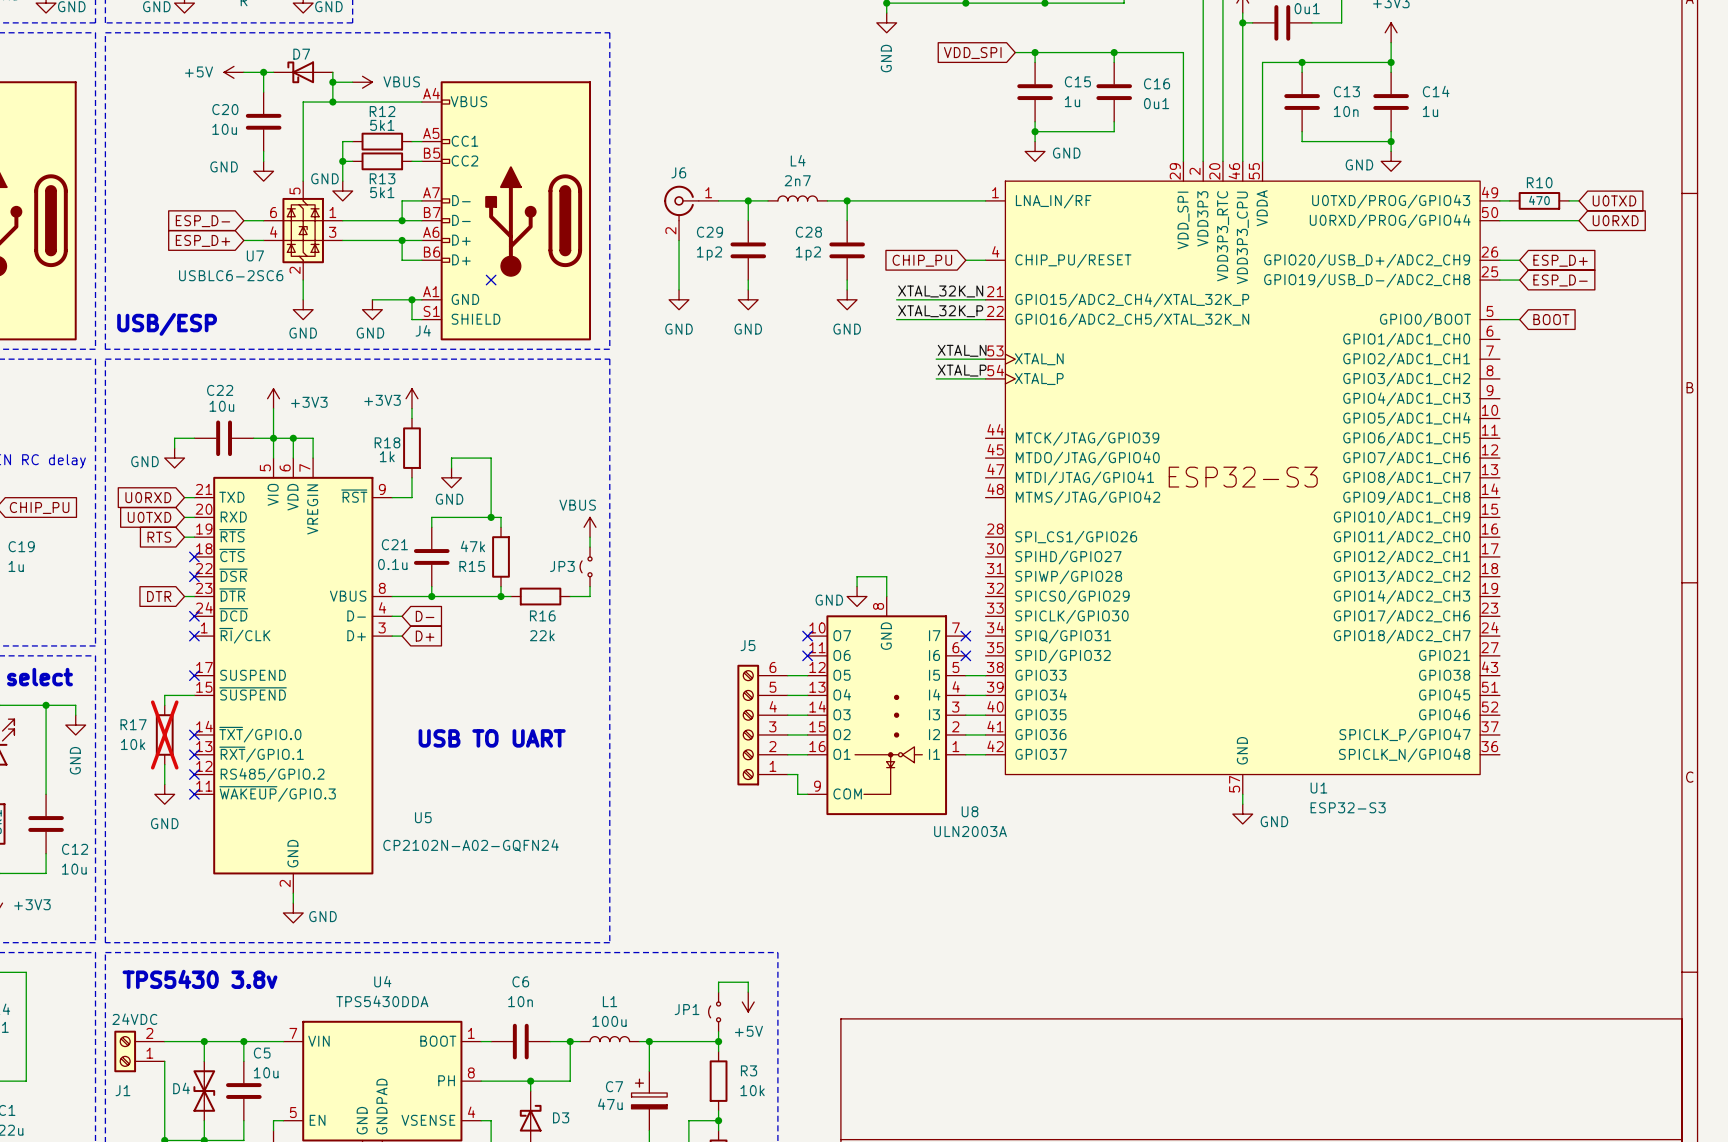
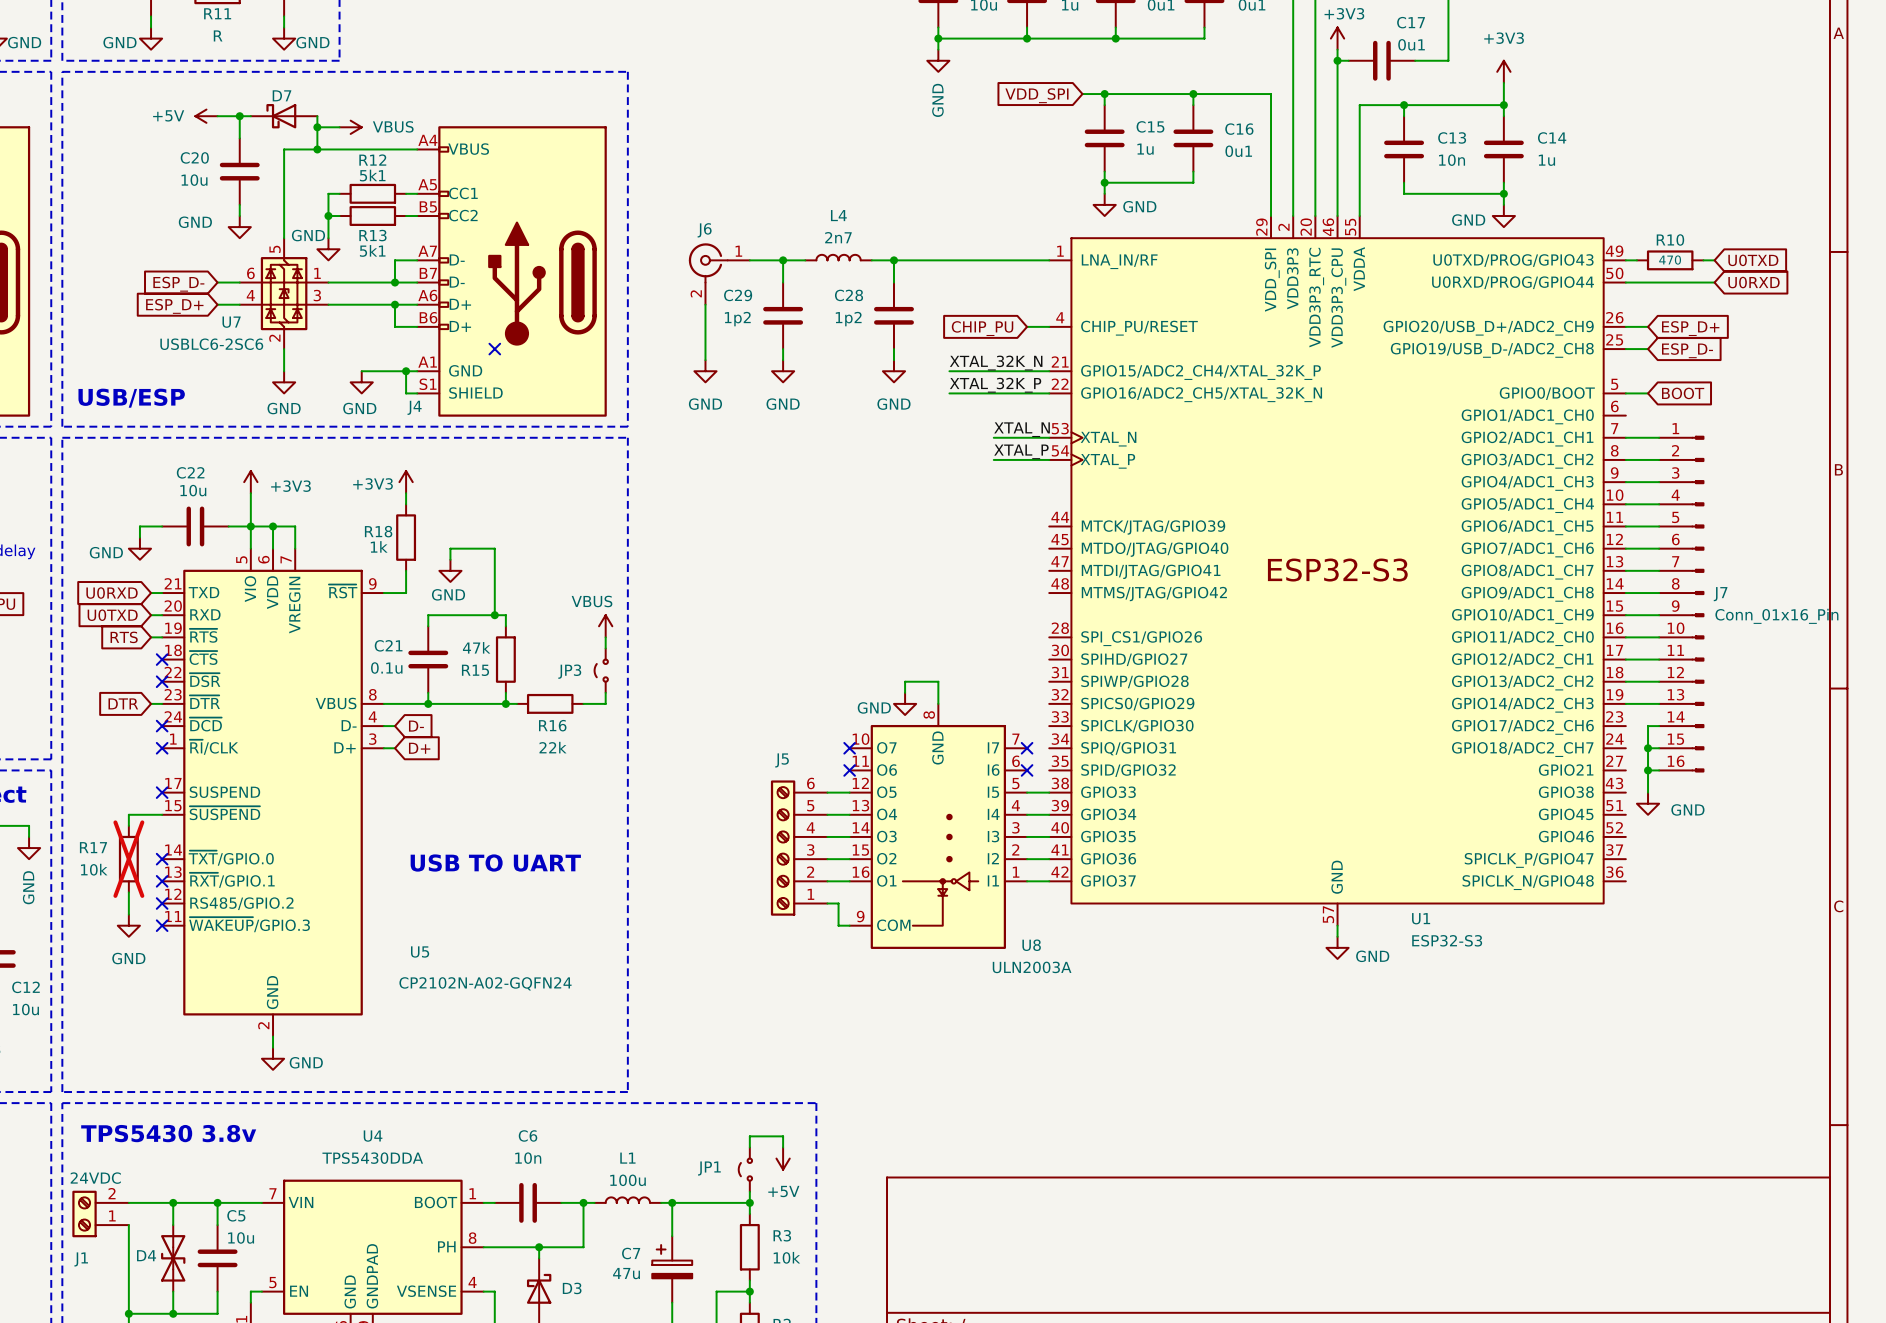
wire: none -> (1625, 437) (1659, 437)
wire: none -> (1625, 459) (1659, 459)
wire: none -> (1625, 482) (1659, 482)
wire: none -> (1625, 504) (1659, 504)
wire: none -> (1625, 526) (1659, 526)
wire: none -> (1625, 548) (1659, 548)
wire: none -> (1625, 570) (1659, 570)
wire: none -> (1625, 593) (1659, 593)
J7: none -> Conn_01x16_Pin (1681, 604)
wire: none -> (1625, 615) (1659, 615)
wire: none -> (1625, 637) (1659, 637)
wire: none -> (1625, 659) (1659, 659)
wire: none -> (1625, 681) (1659, 681)
wire: none -> (1625, 703) (1659, 703)
wire: none -> (1659, 726) (1648, 726) (1648, 792)
wire: none -> (1648, 748) (1659, 748)
junction: none -> (1648, 748)
wire: none -> (1648, 770) (1659, 770)
junction: none -> (1648, 770)
power symbol: none -> GND (1648, 803)

